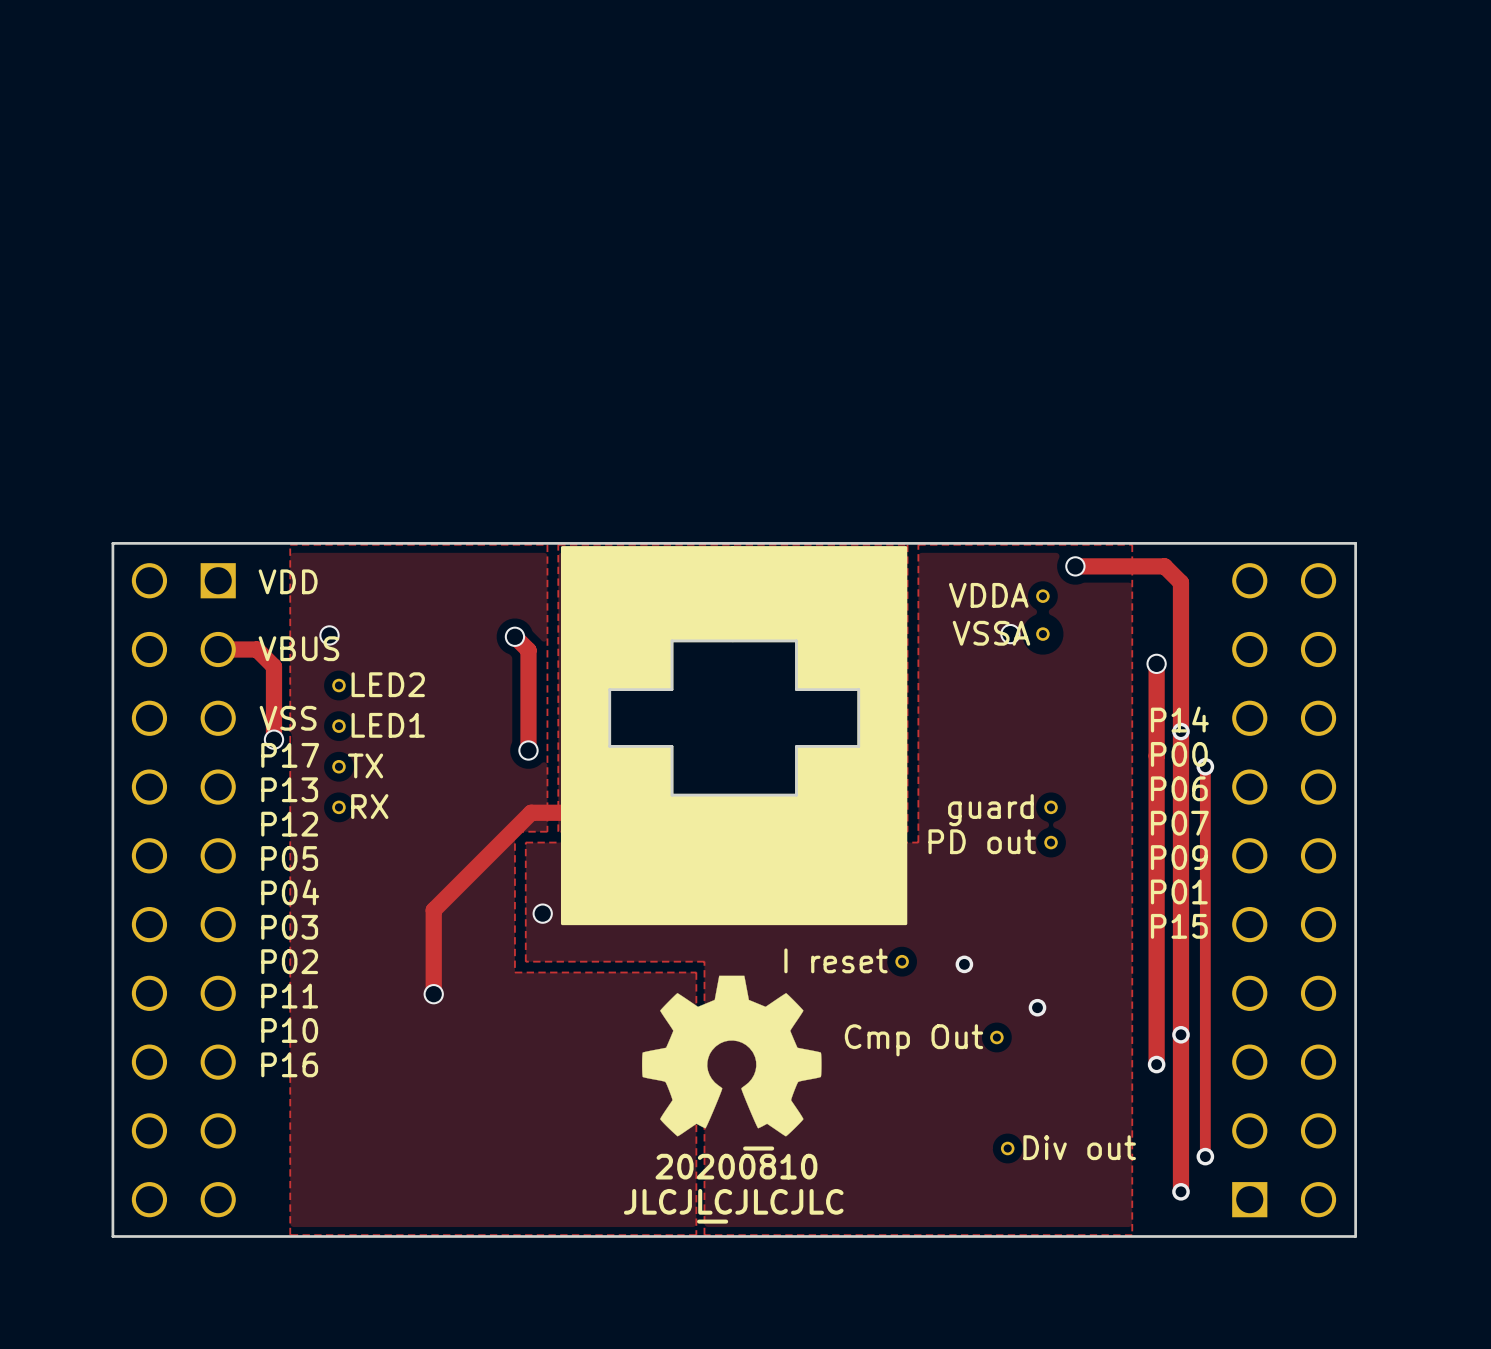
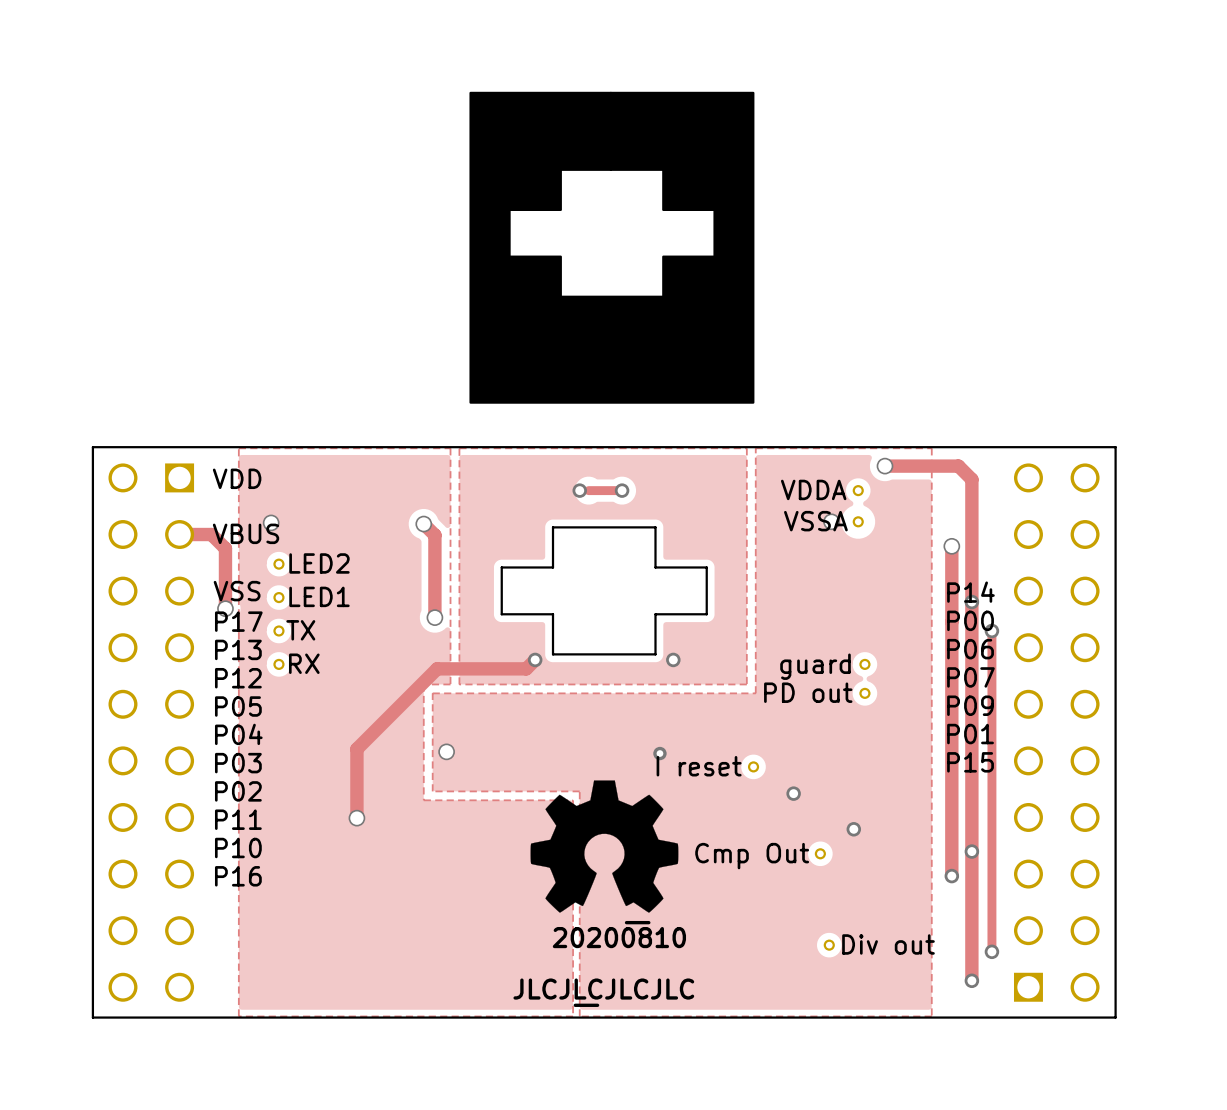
drawing position: (734, 735) -> (611, 247)
part position: (902, 961) -> (753, 766)
drawing position: (731, 1056) -> (604, 846)
drawing position: (758, 1148) -> (637, 922)

